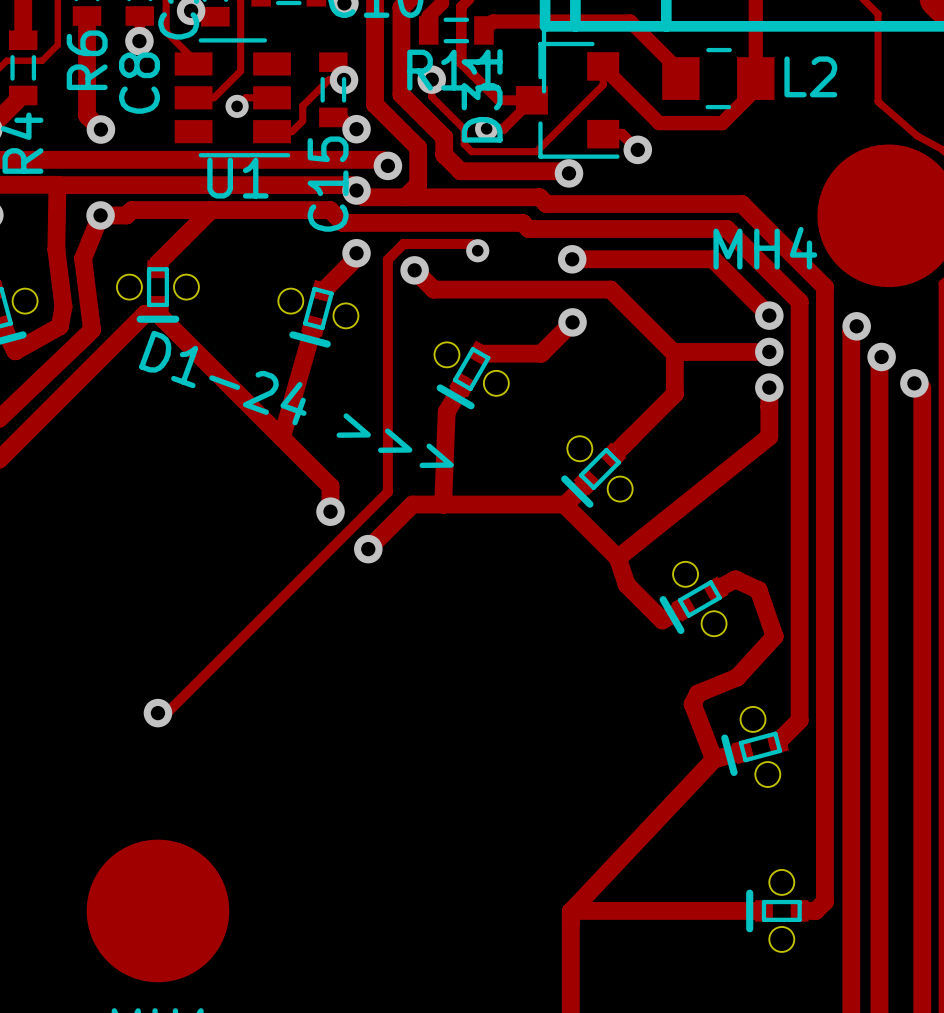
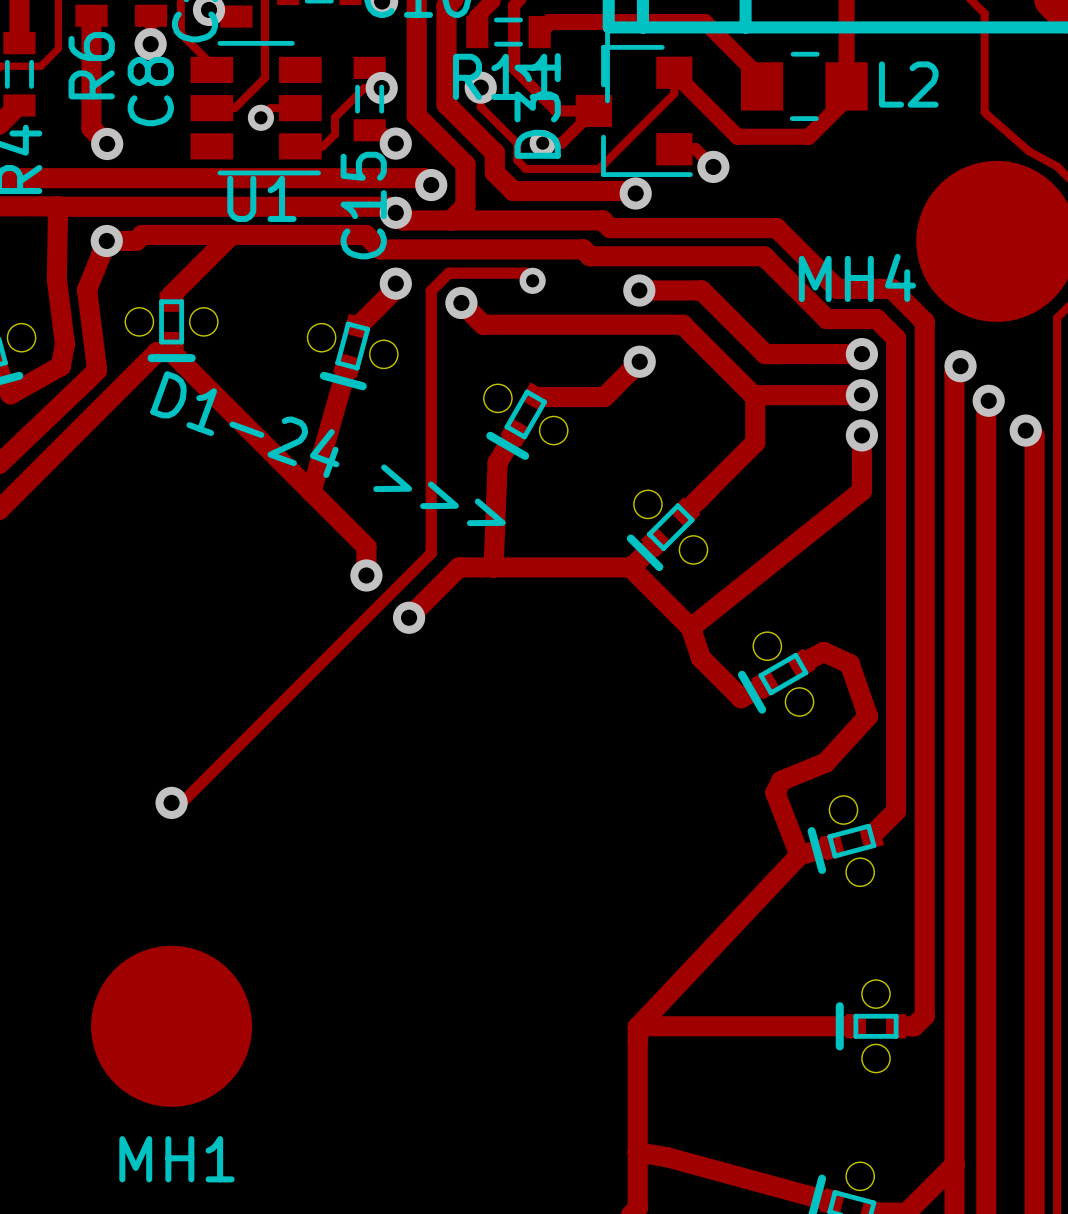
track: (693, 204) (741, 204) (795, 257) -> (776, 228) (837, 288) (891, 288)
track: (682, 229) (726, 229) (782, 284) -> none
track: (627, 259) (713, 259) -> (764, 256) (798, 290)
track: none -> (701, 290) (765, 354) (861, 354)
track: (738, 284) (769, 315) -> (826, 319) (876, 319)

